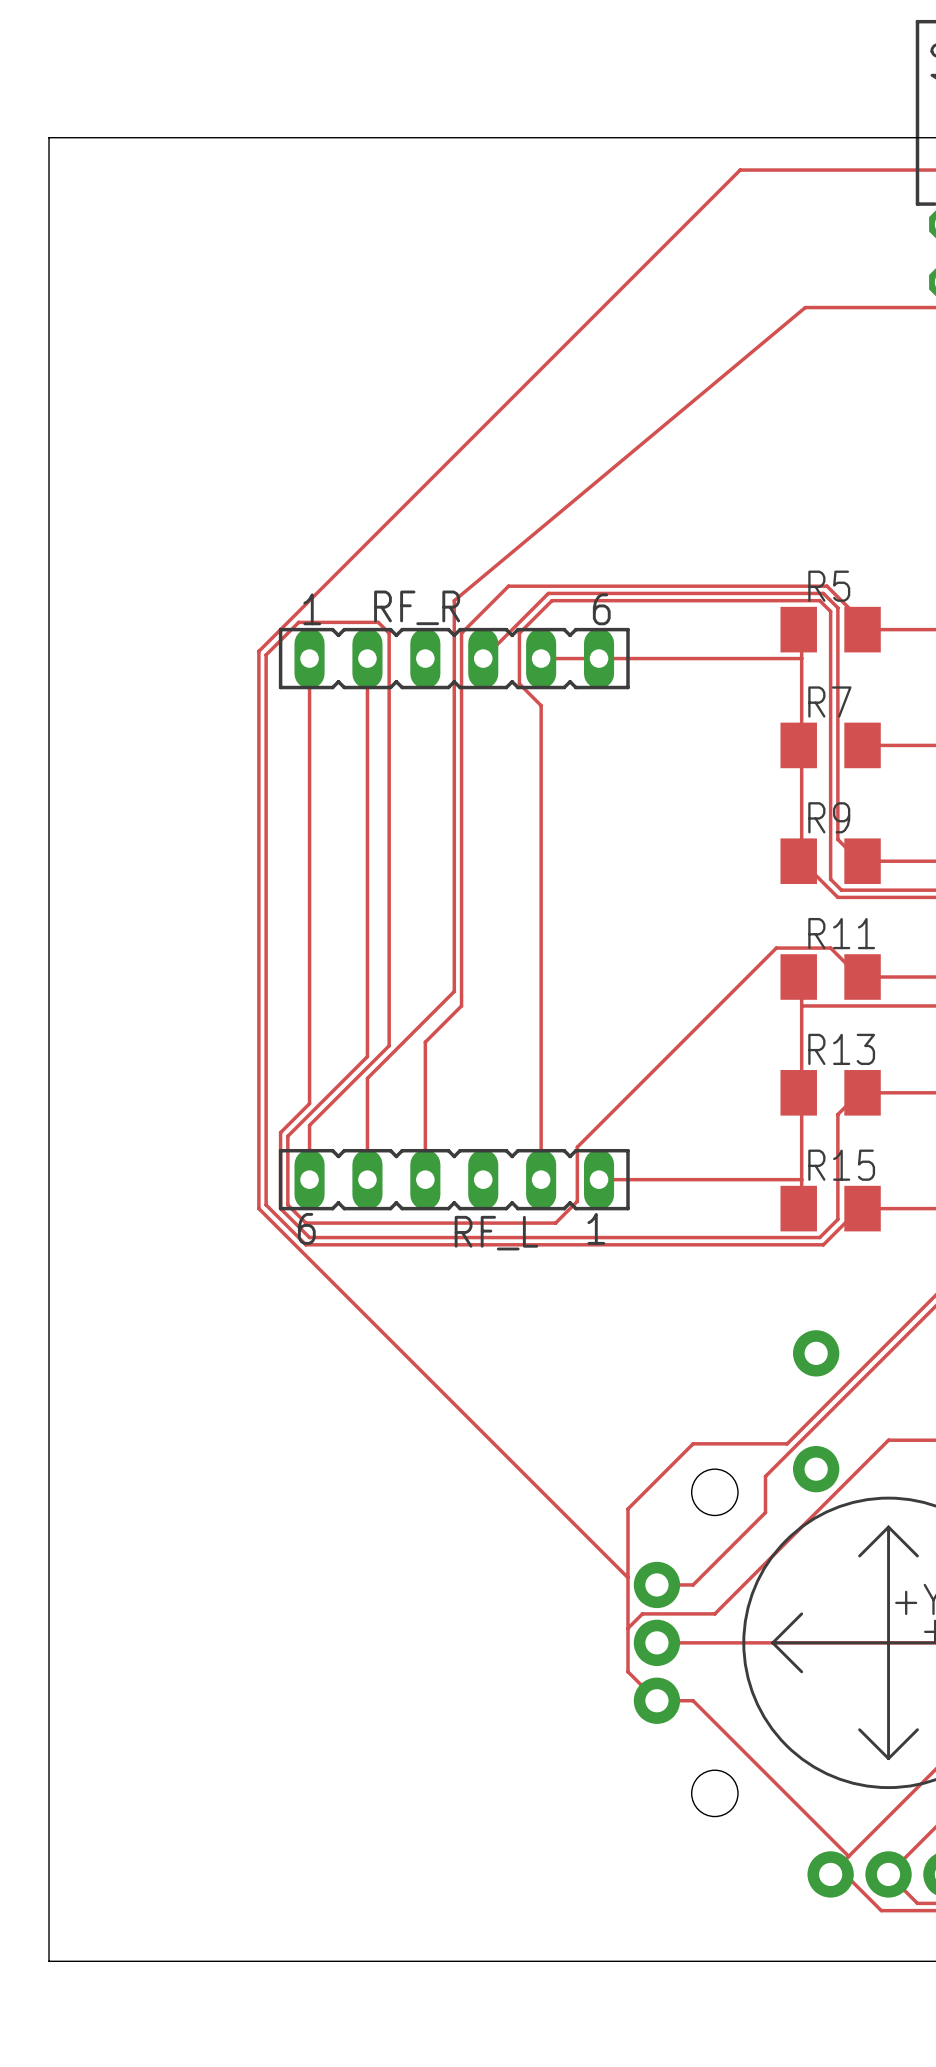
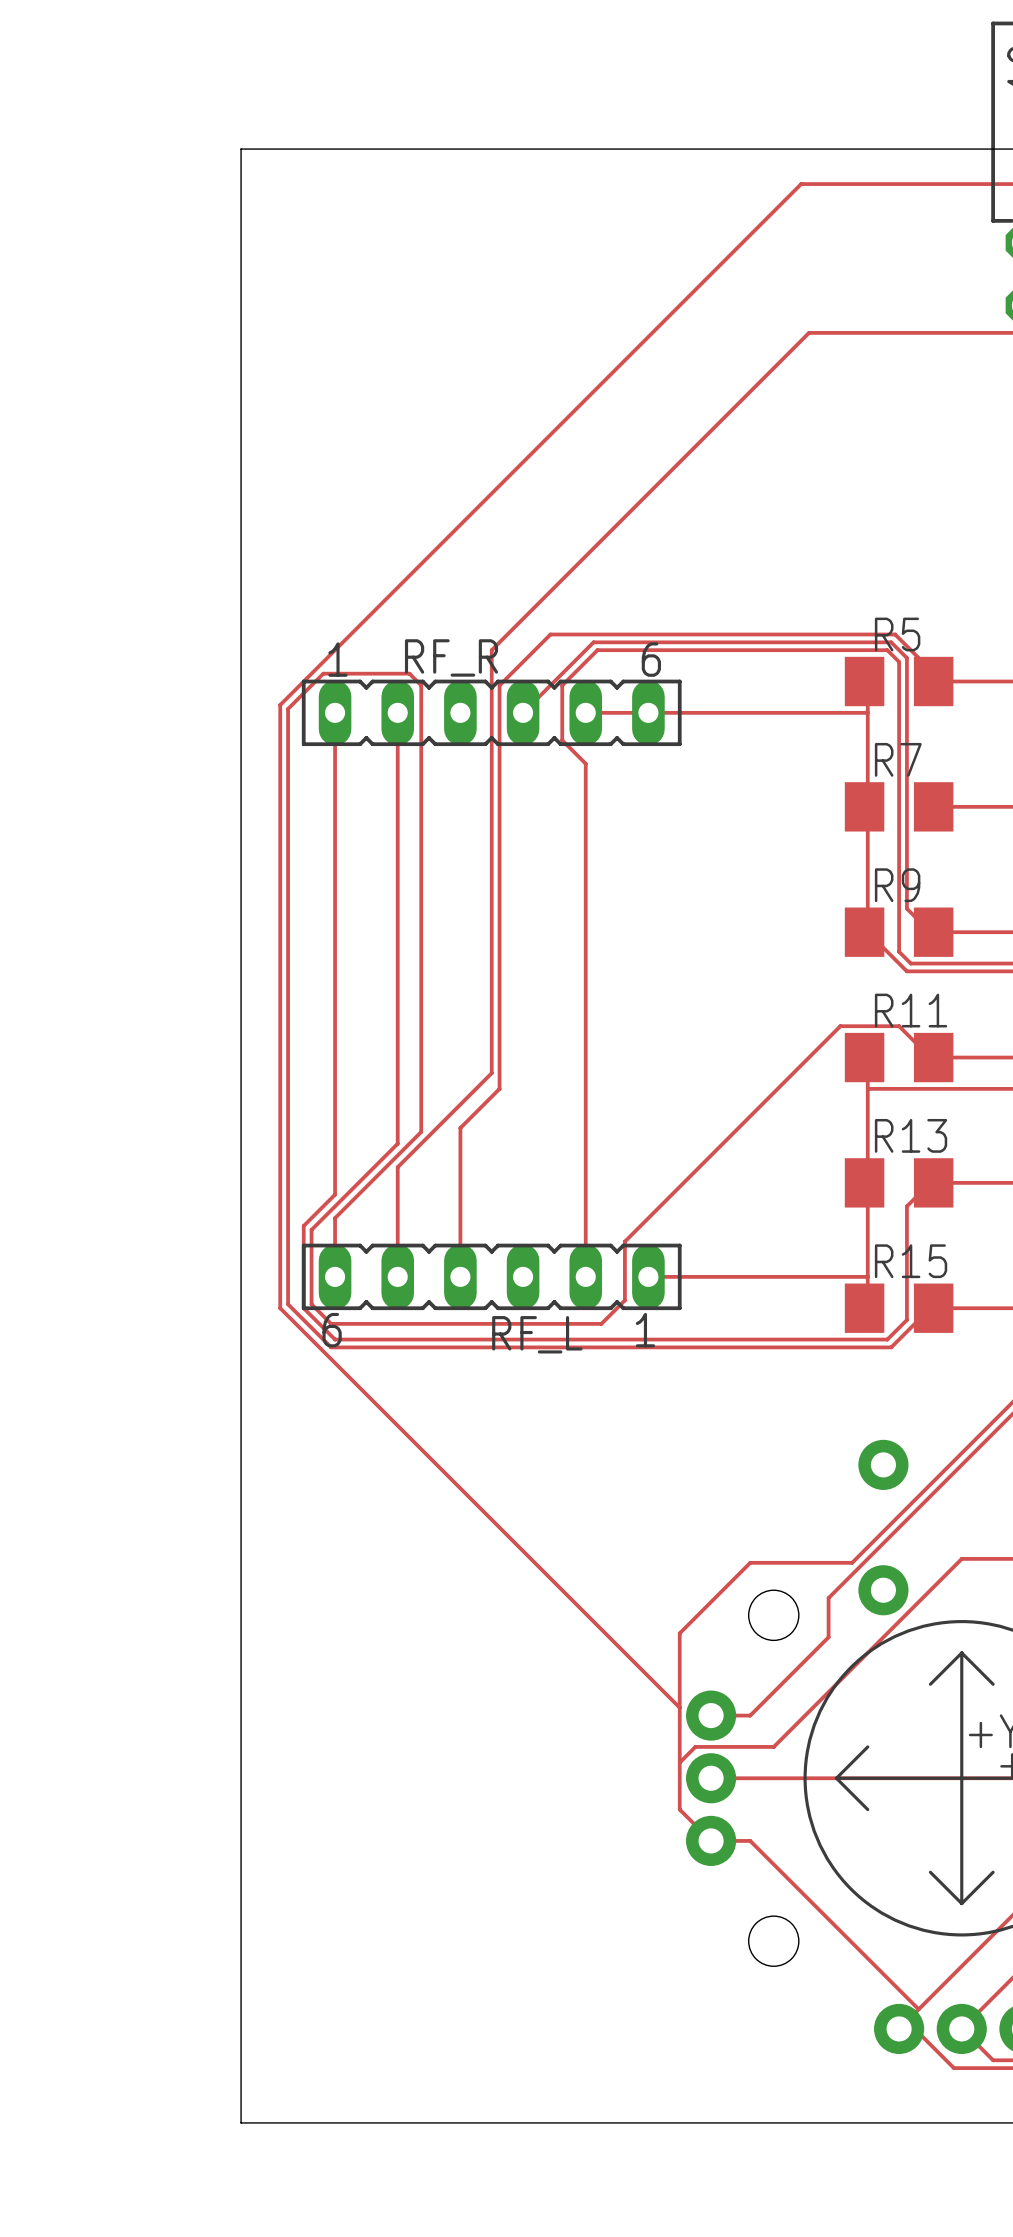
board edge: (222, 137) (49, 137) (49, 1961) (222, 1961) -> (241, 149) (241, 2122)
track: (805, 307) (454, 600) -> (871, 332) (809, 332) (491, 650)

